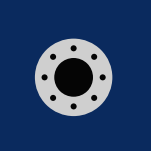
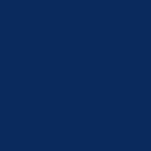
part: (73, 77) -> none

